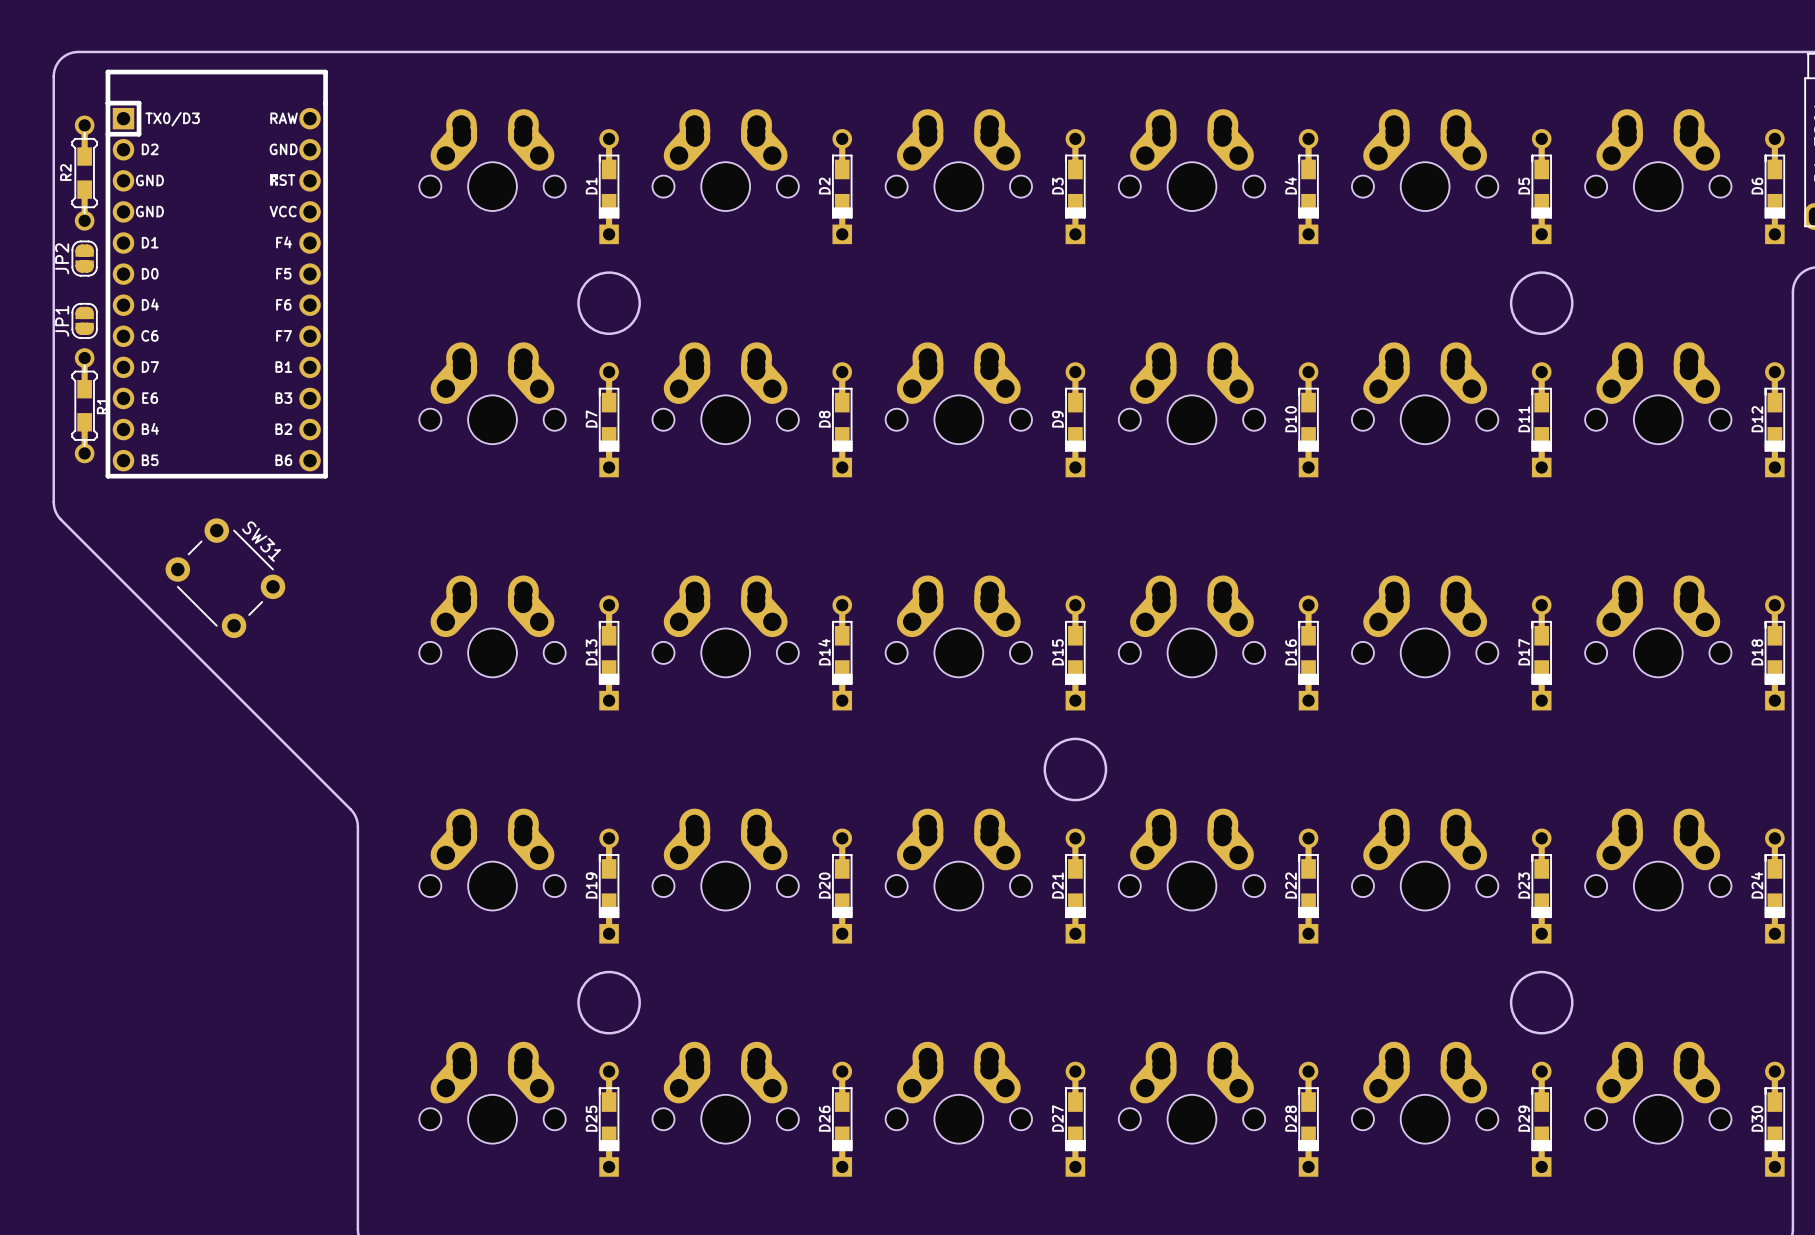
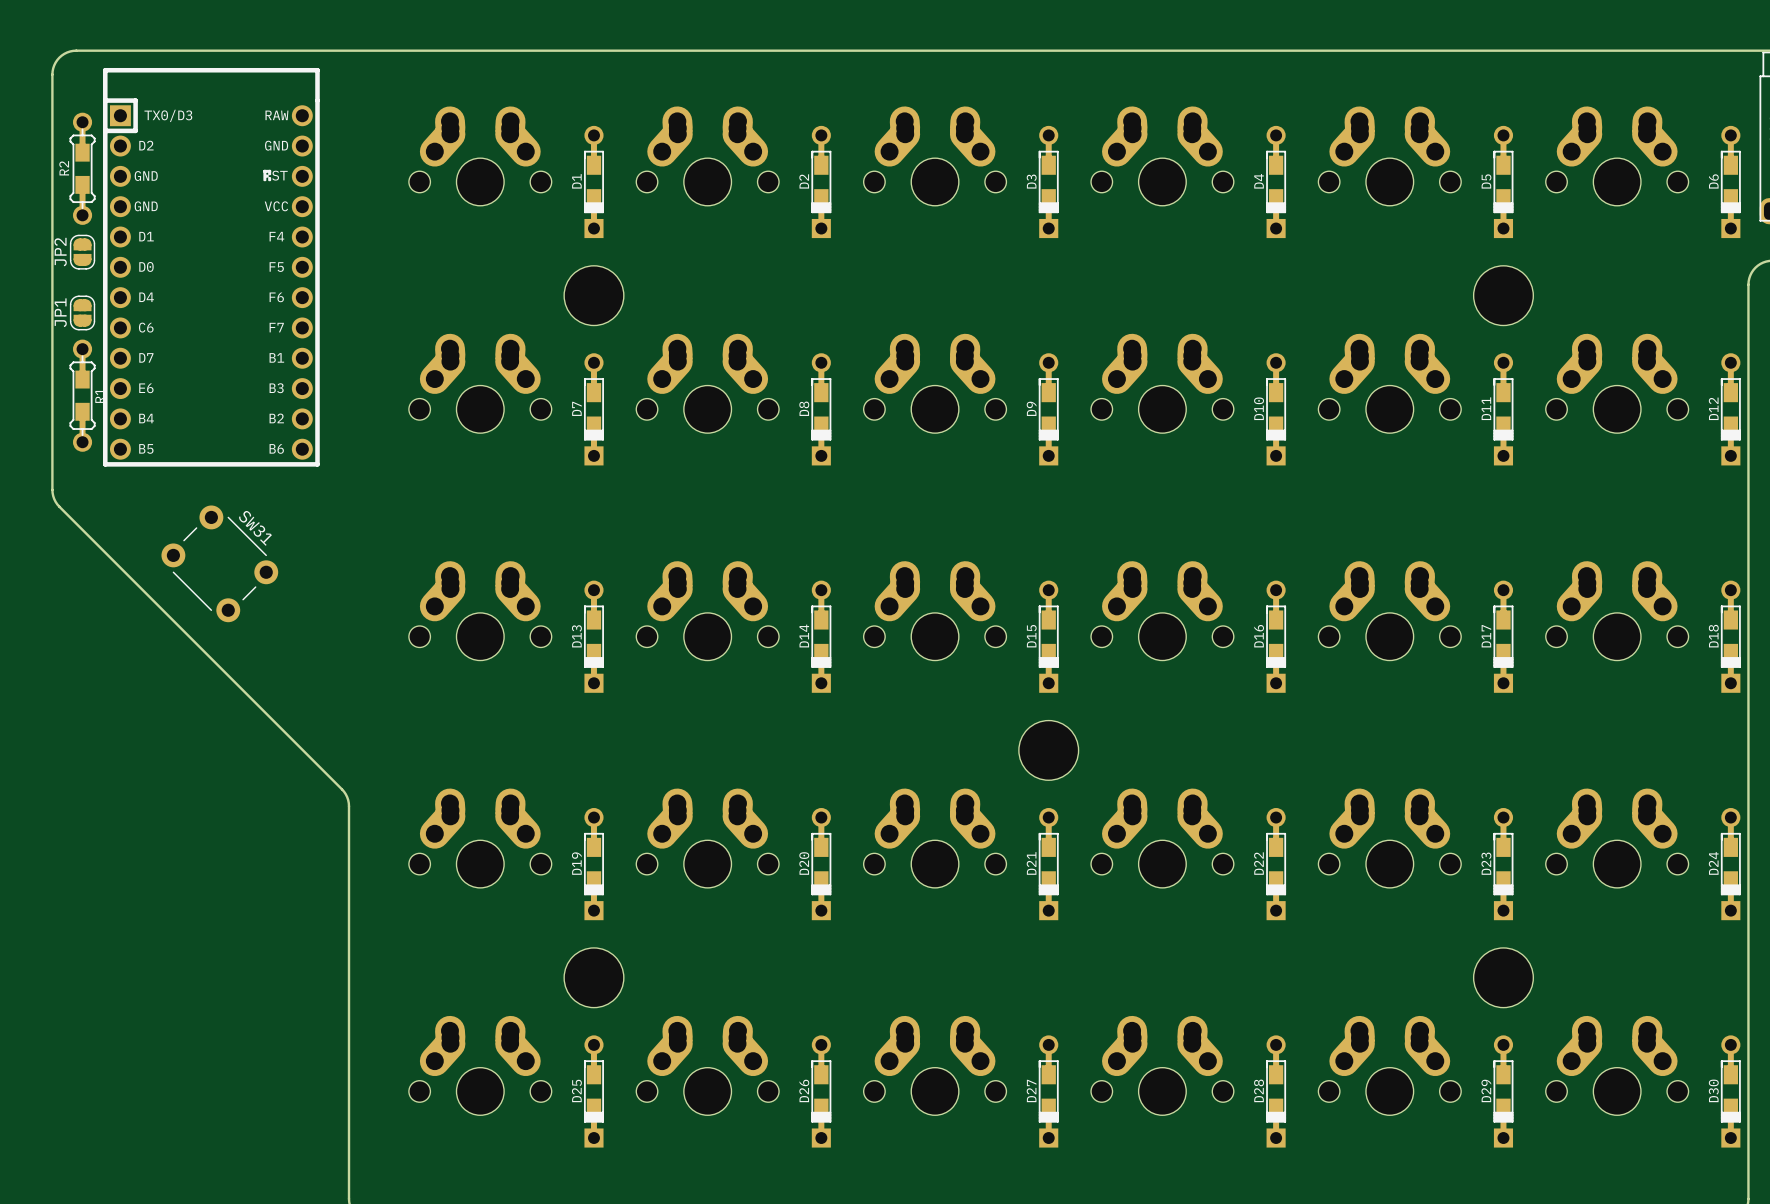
round board edge: [577, 271, 641, 336] -> none
round board edge: [1509, 271, 1574, 336] -> none
part: none -> (593, 295)
part: none -> (1503, 295)
round board edge: [1043, 737, 1108, 802] -> none
part: none -> (1048, 750)
round board edge: [577, 970, 641, 1035] -> none
round board edge: [1509, 970, 1574, 1035] -> none
part: none -> (593, 977)
part: none -> (1503, 977)

